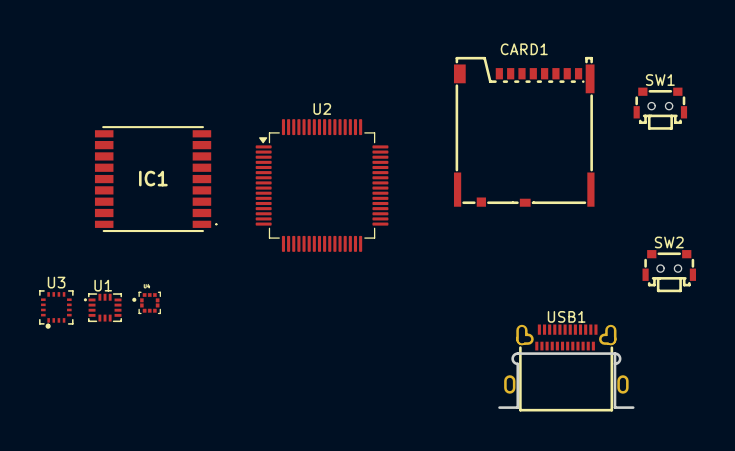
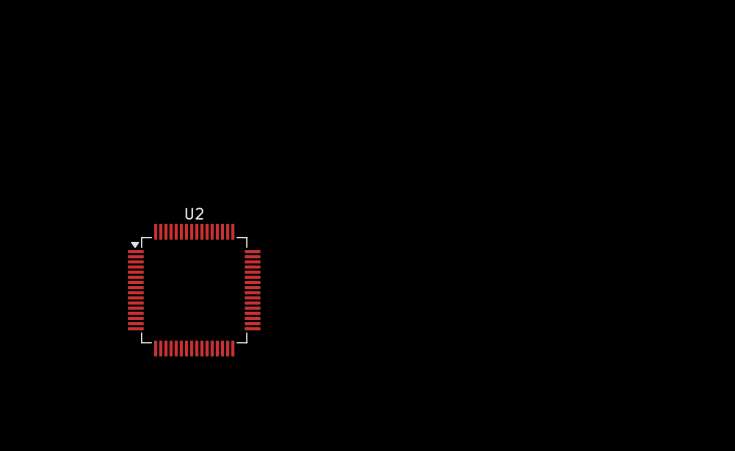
SW1: (660, 108) -> none
U2 footprint: [255, 119, 389, 252] -> [127, 223, 261, 357]
CARD1: (524, 131) -> none
IC1: (156, 179) -> none
SW2: (669, 271) -> none
part: (146, 302) -> none
U1: (102, 307) -> none
U3: (56, 309) -> none
USB1: (566, 367) -> none

